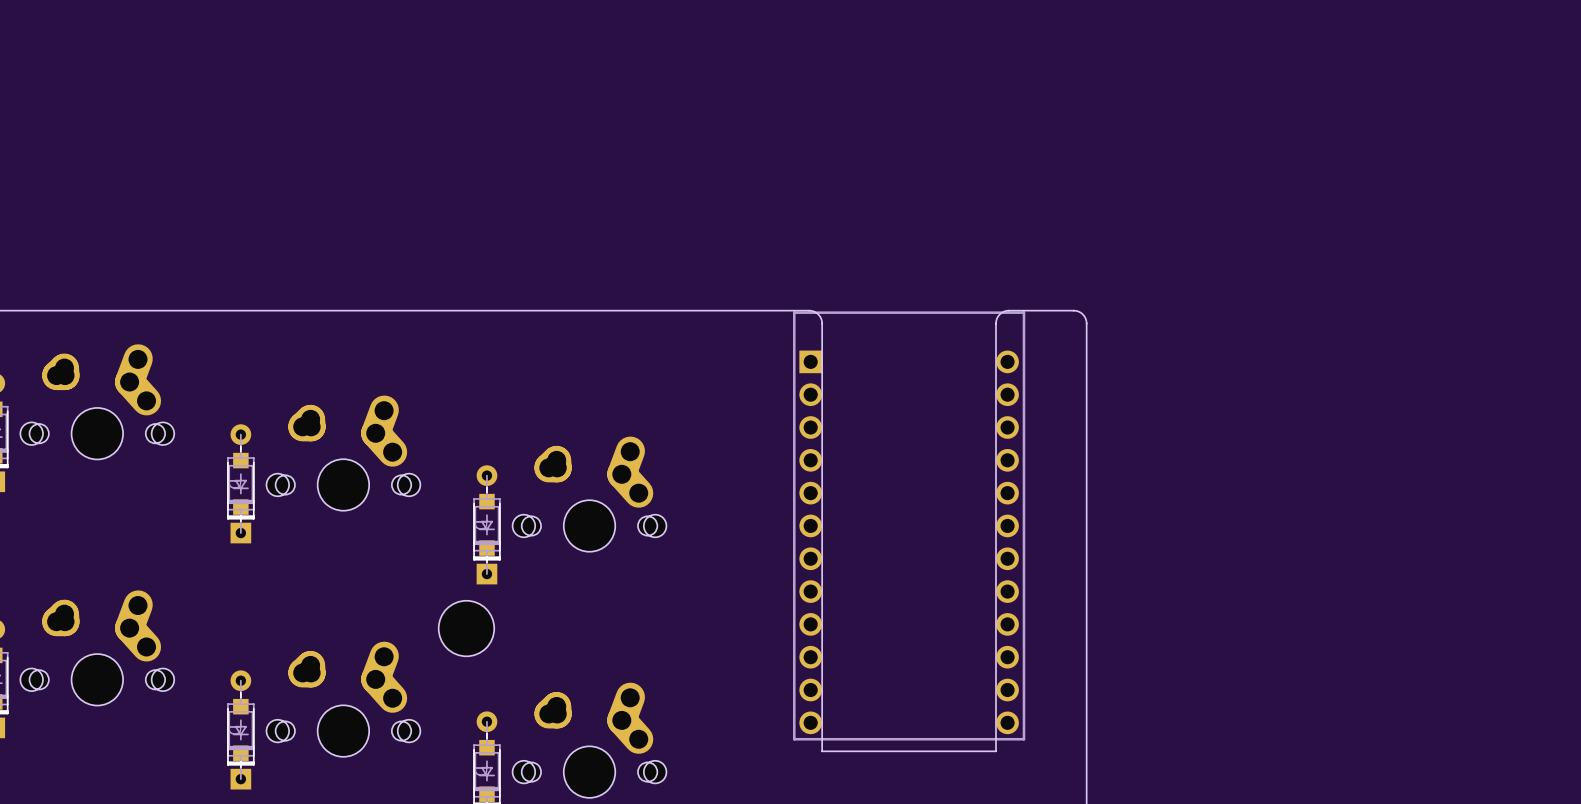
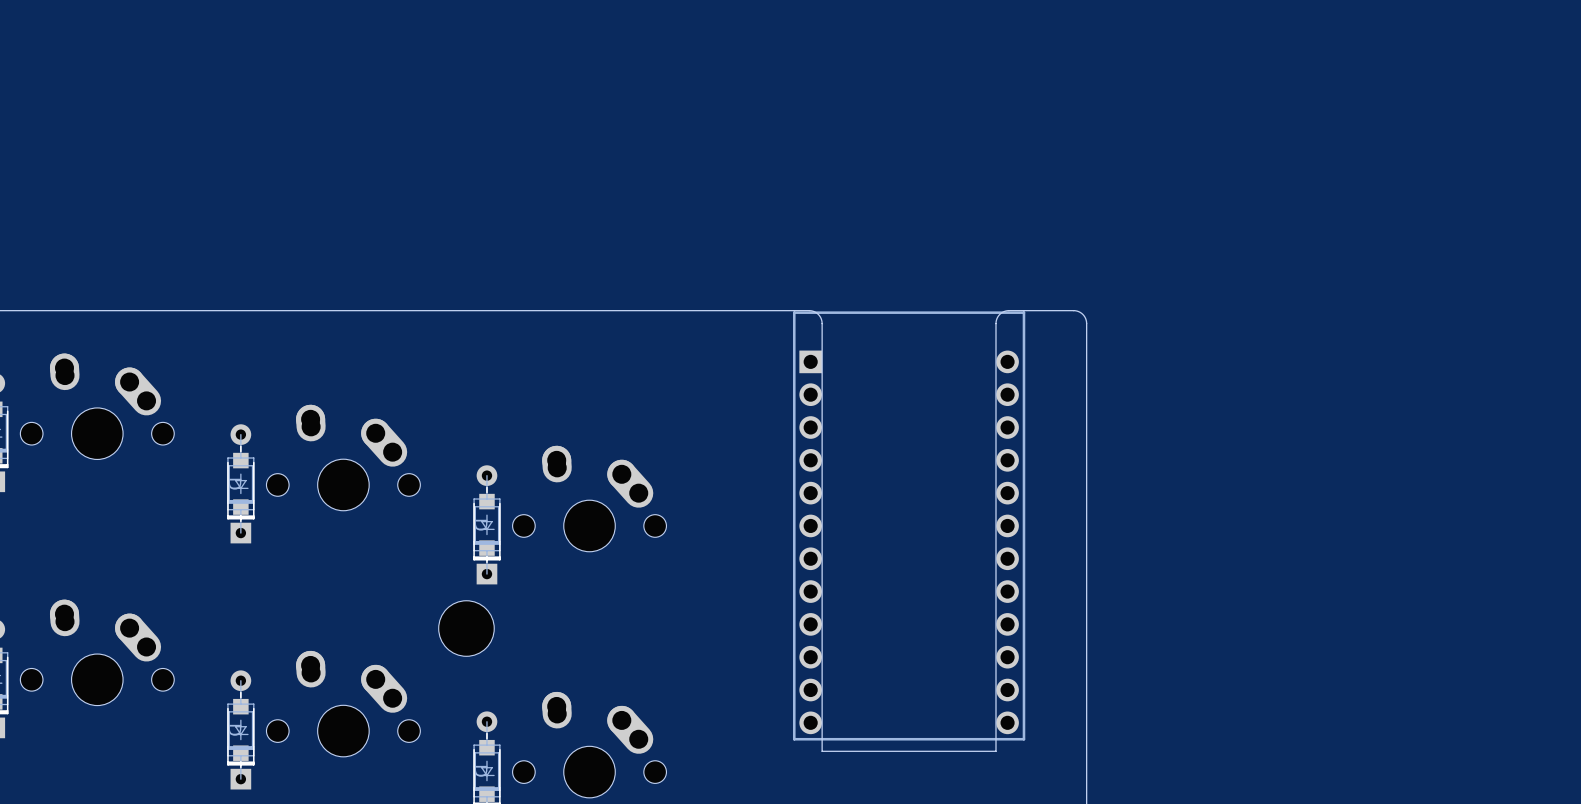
part footprint: [20, 344, 175, 460] -> [20, 353, 175, 460]
part footprint: [266, 395, 421, 511] -> [266, 404, 421, 511]
part footprint: [512, 436, 667, 552] -> [512, 445, 667, 552]
part footprint: [20, 590, 175, 706] -> [20, 599, 175, 706]
part footprint: [266, 641, 421, 757] -> [266, 650, 421, 757]
part footprint: [512, 682, 667, 798] -> [512, 691, 667, 798]

